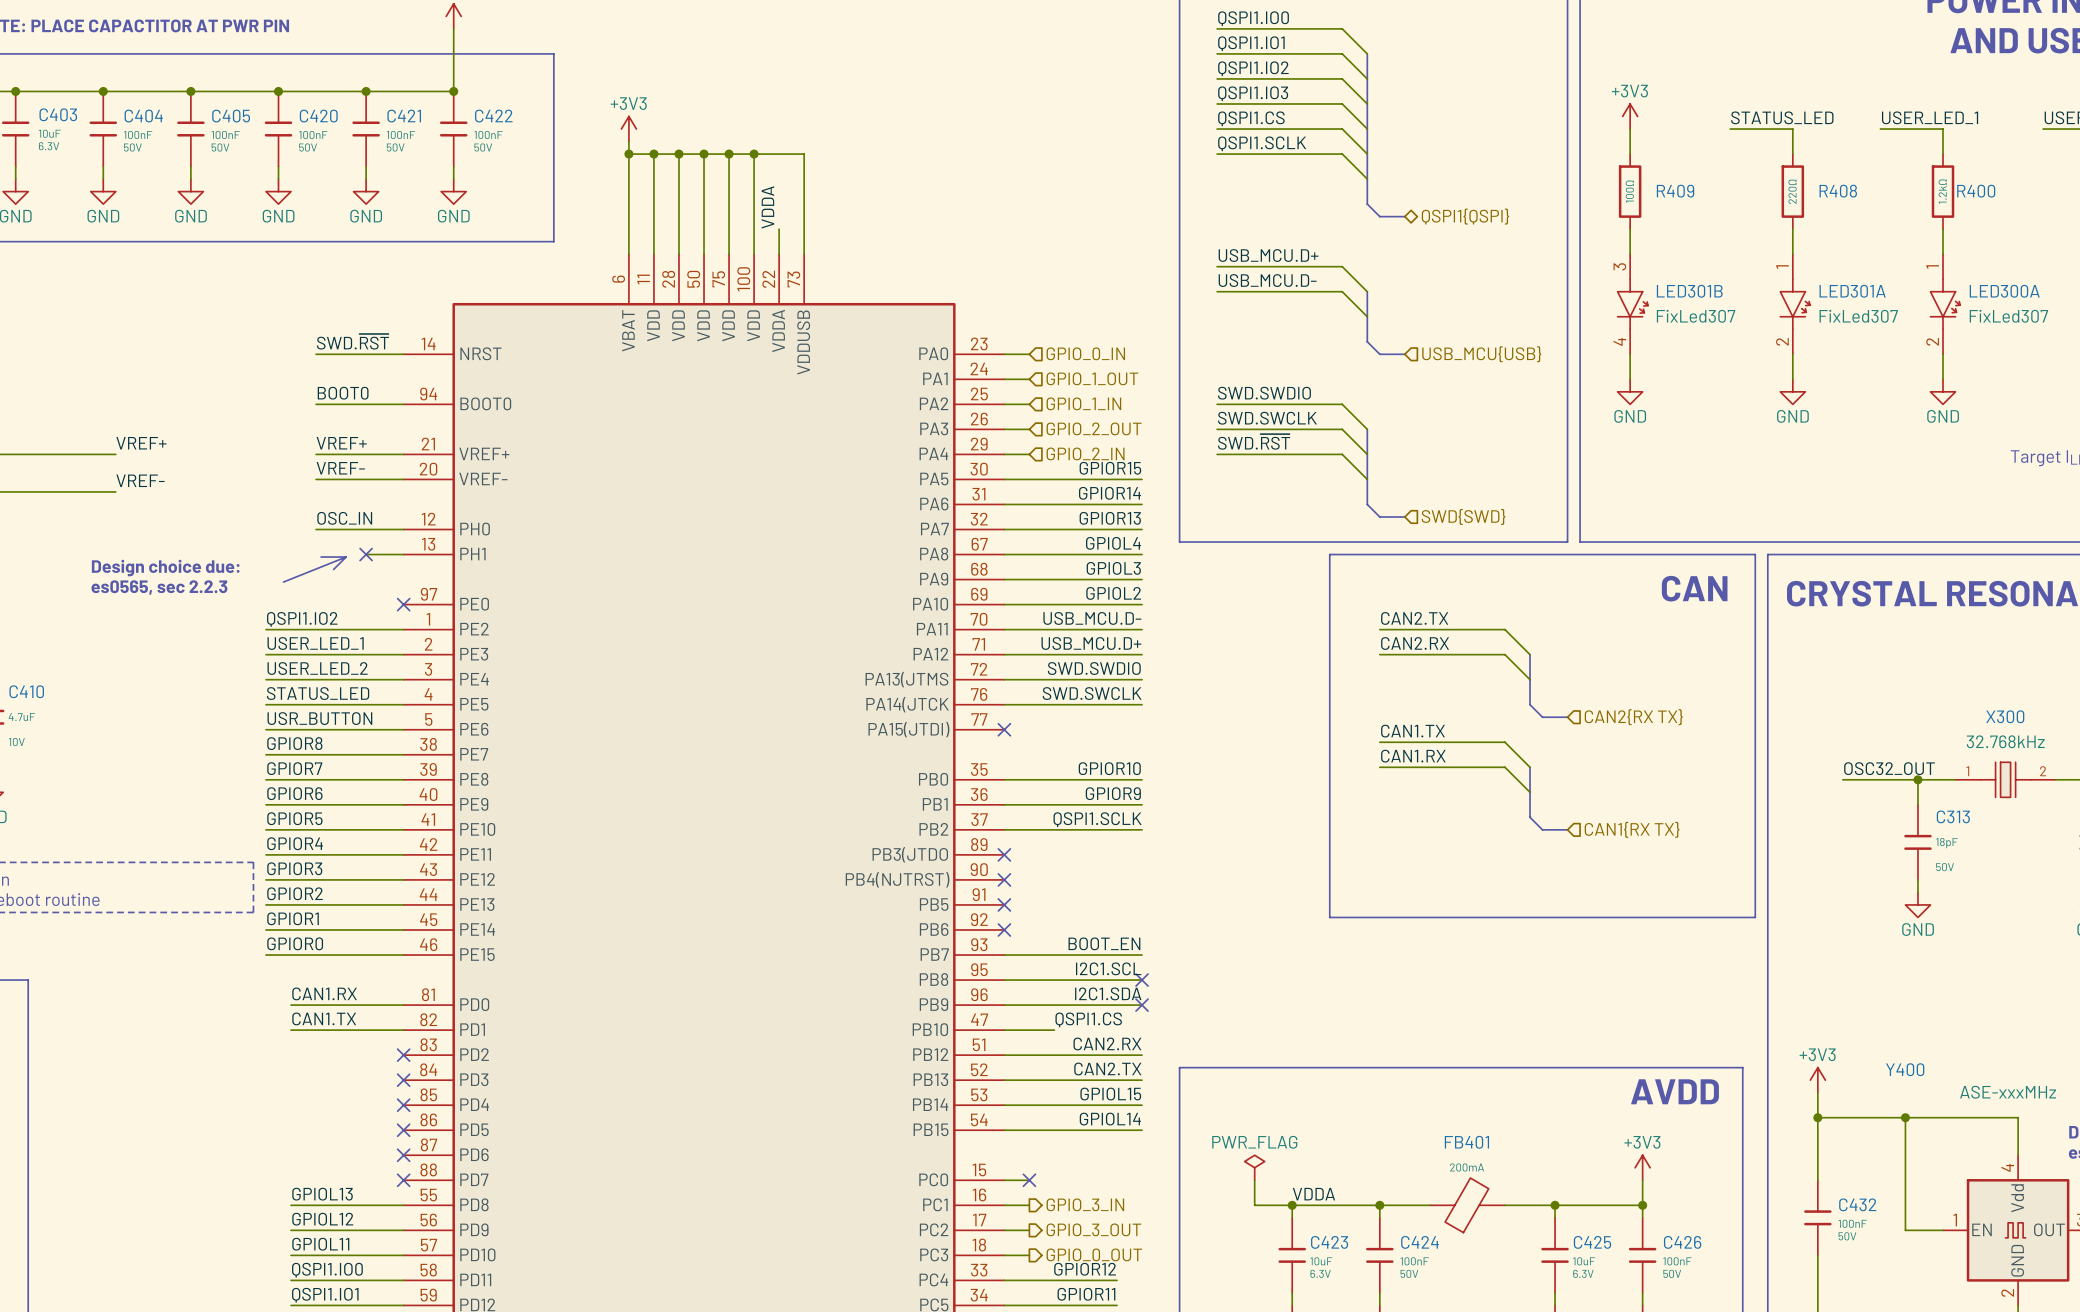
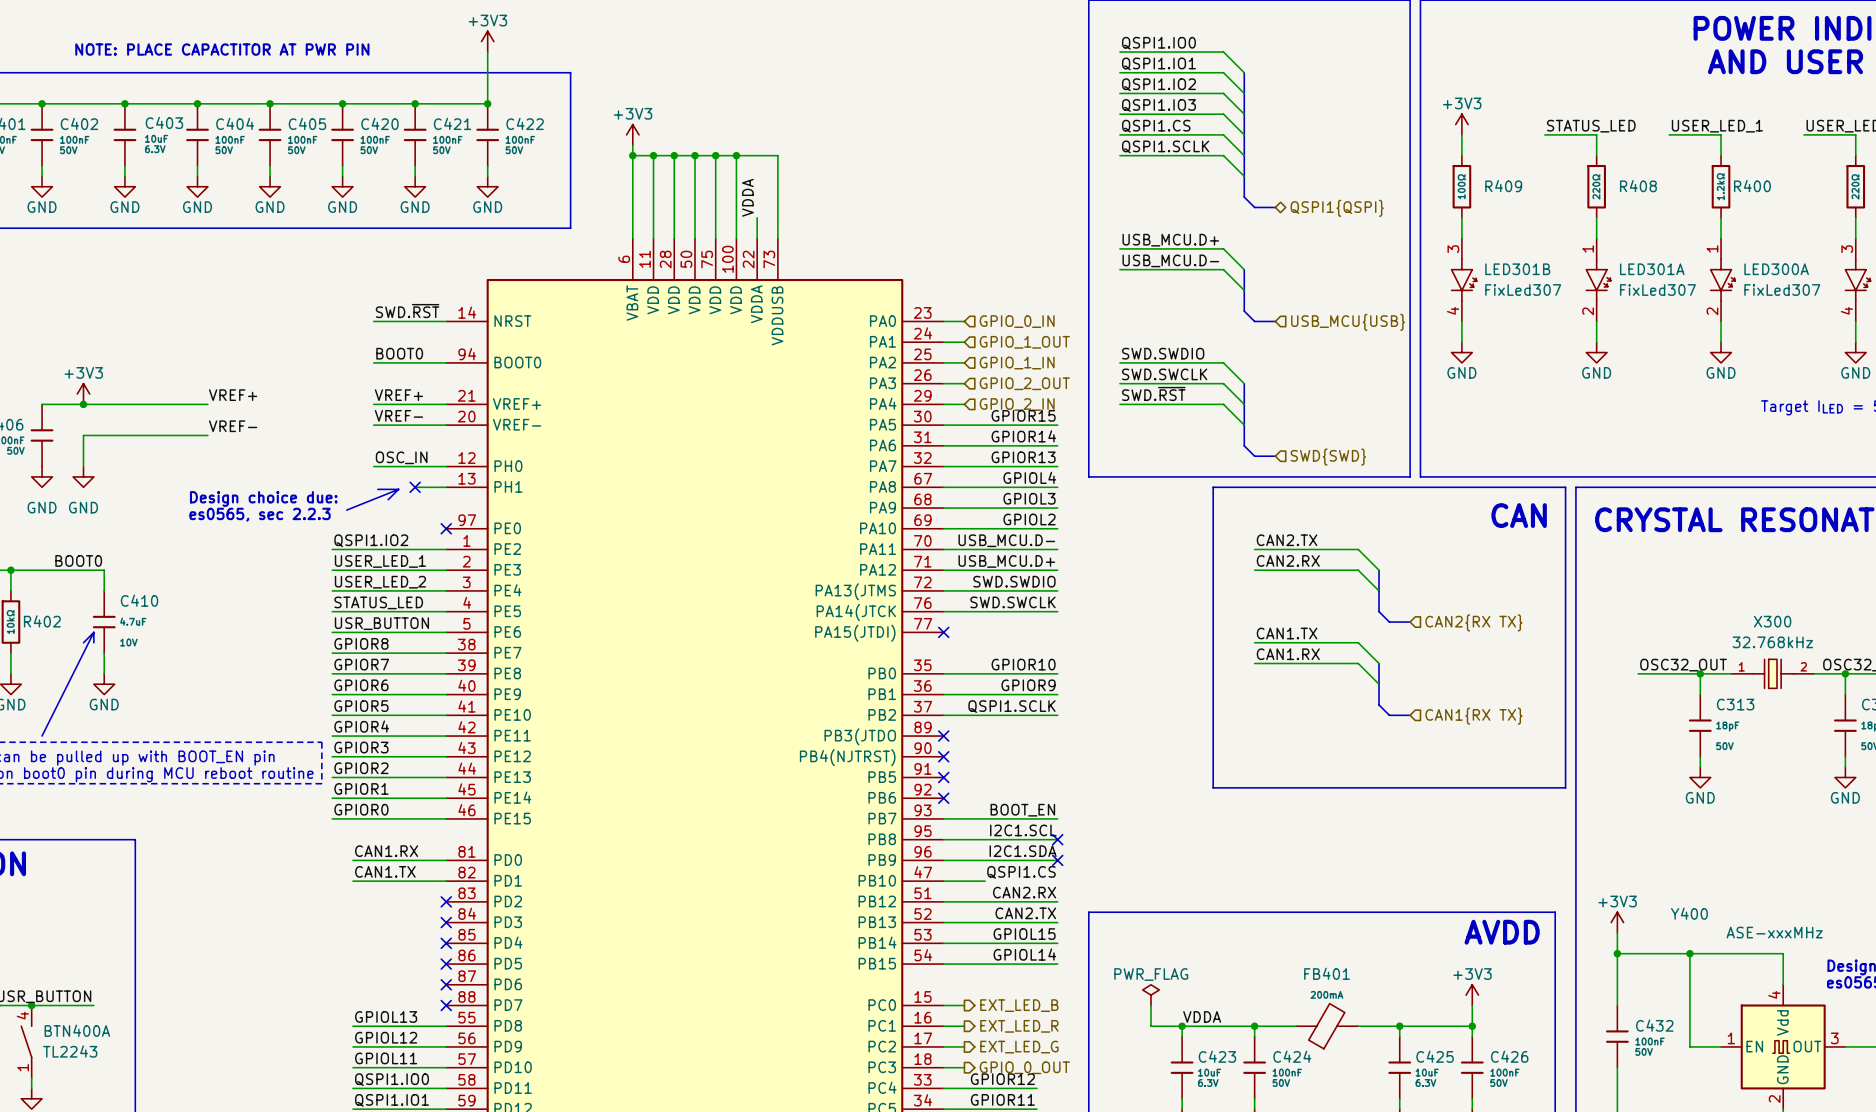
hierarchical label: none -> EXT_LED_B (1019, 1005)
no-connect mark: (1029, 1180) -> none
hierarchical label: GPIO_3_IN (1085, 1204) -> EXT_LED_R (1019, 1026)
hierarchical label: GPIO_3_OUT (1093, 1229) -> EXT_LED_G (1019, 1047)

